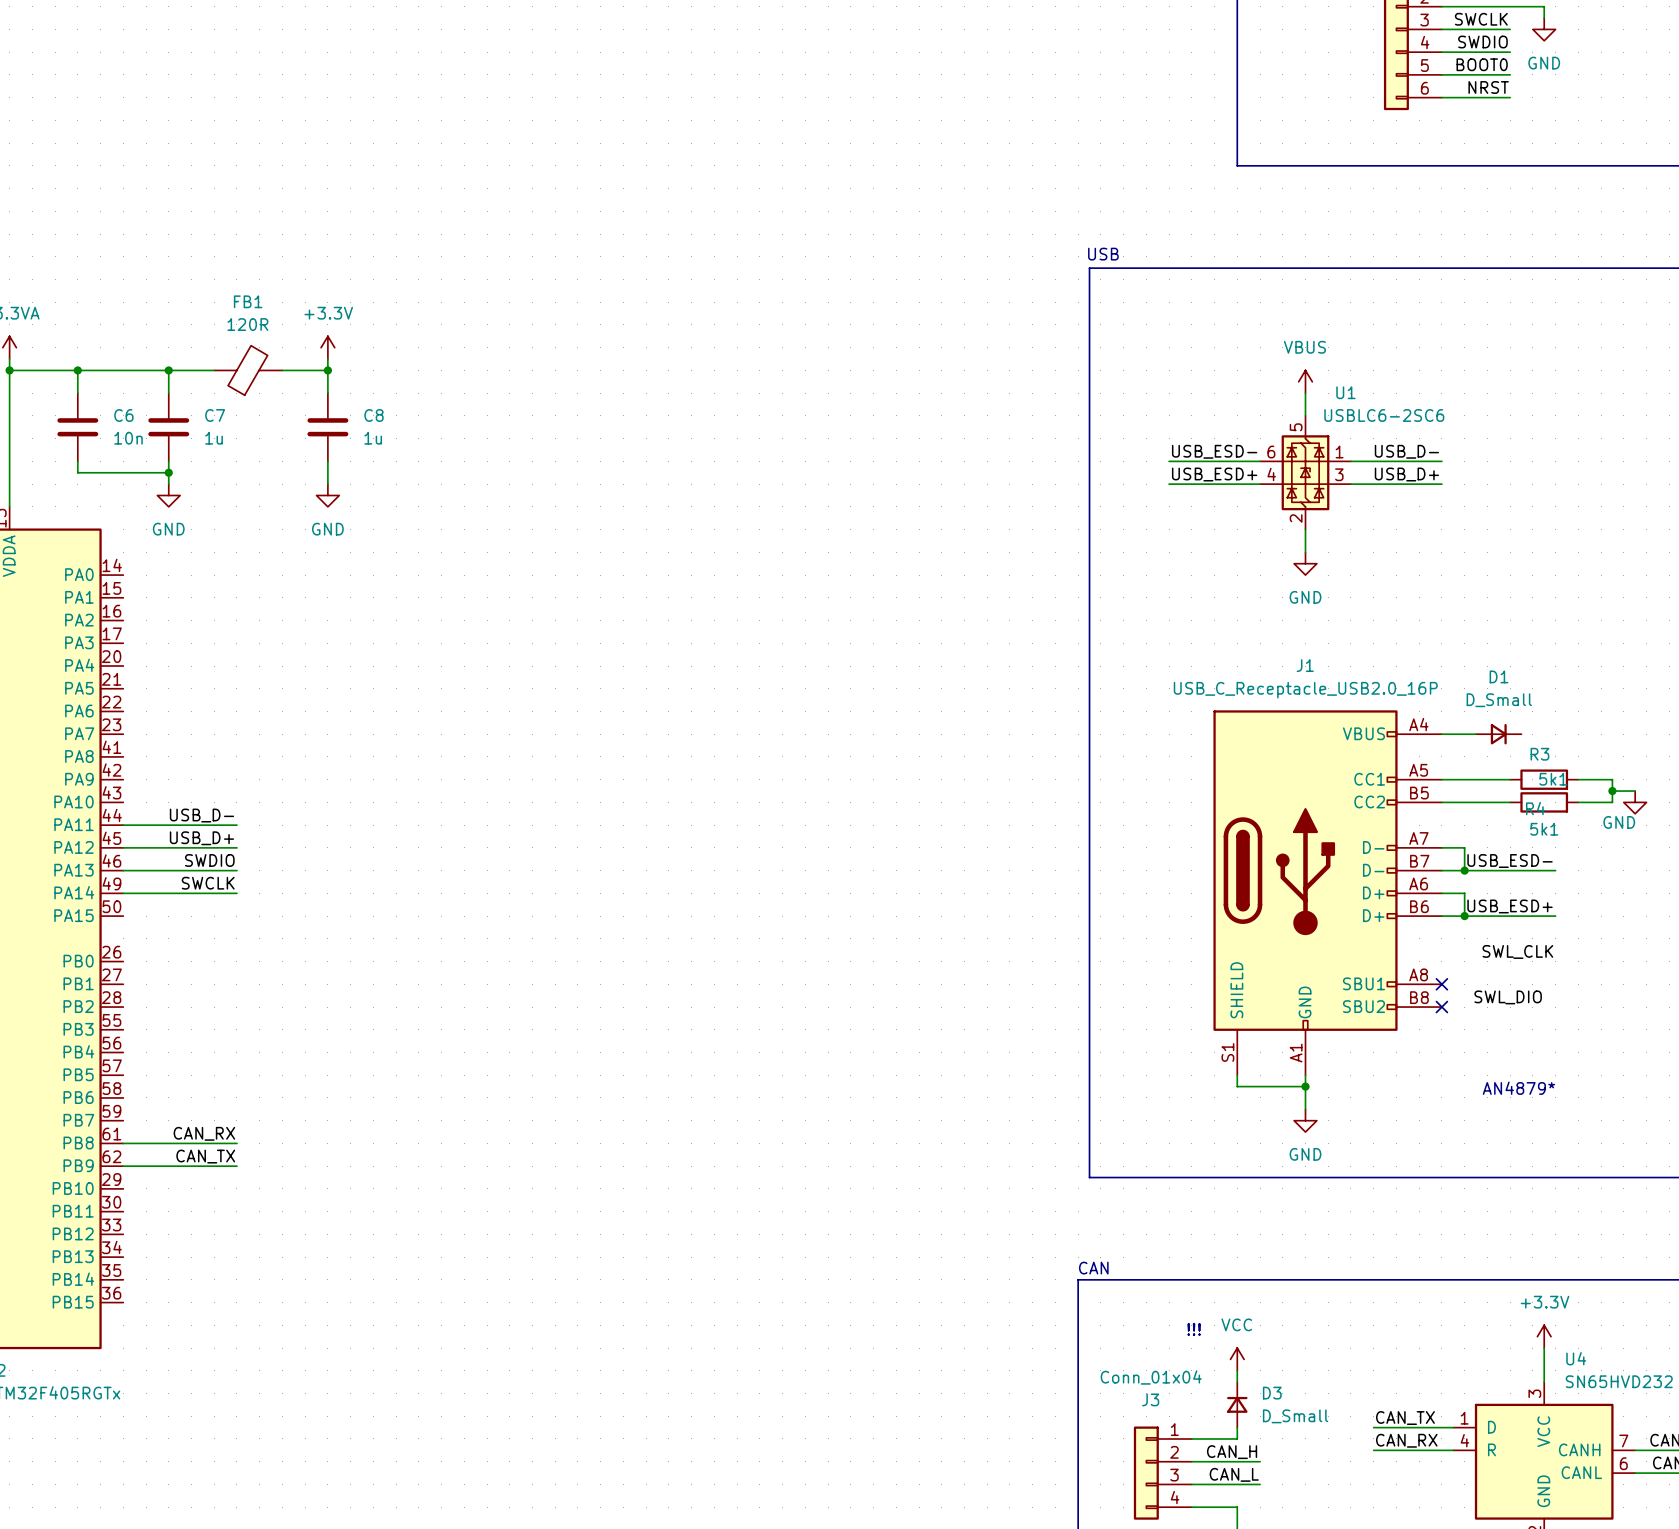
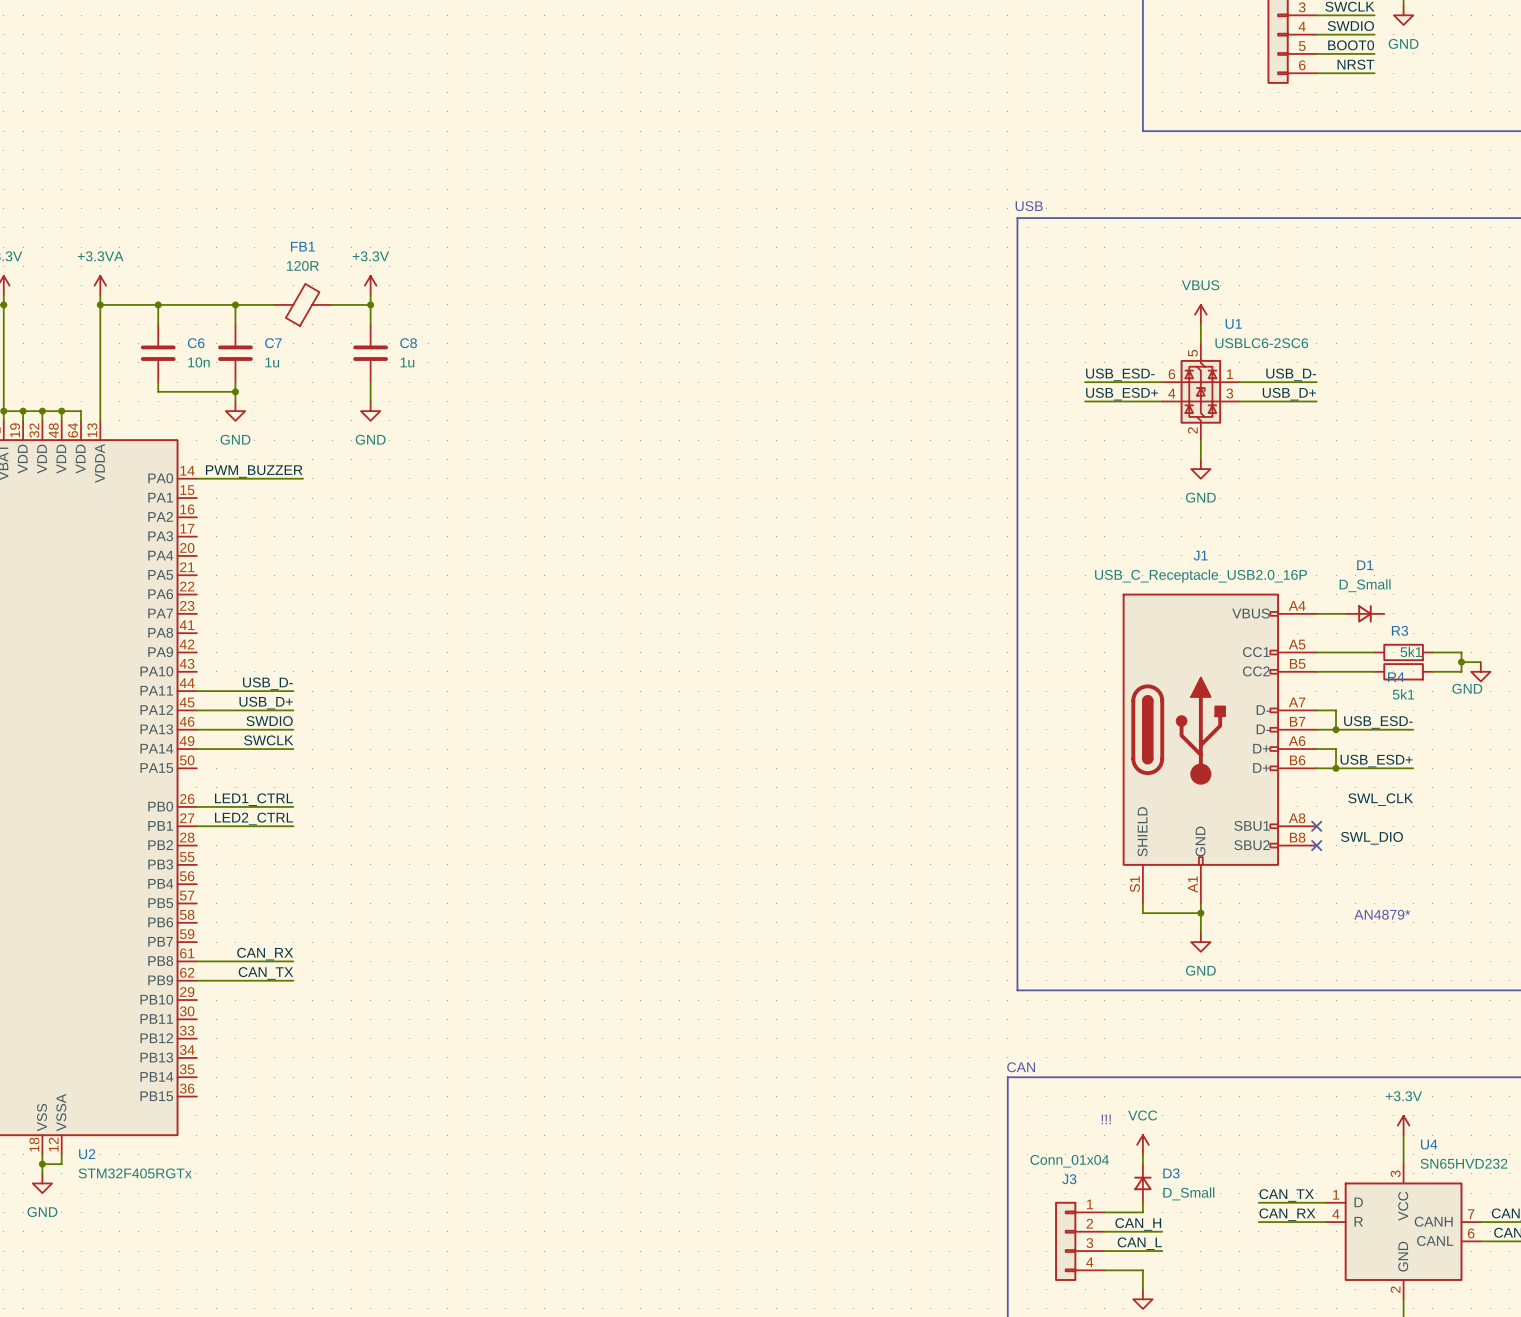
label: none -> PWM_BUZZER (254, 471)
wire: none -> (196, 478) (303, 478)
label: none -> LED1_CTRL (253, 799)
wire: none -> (196, 806) (293, 806)
label: none -> LED2_CTRL (253, 818)
wire: none -> (196, 826) (293, 826)

